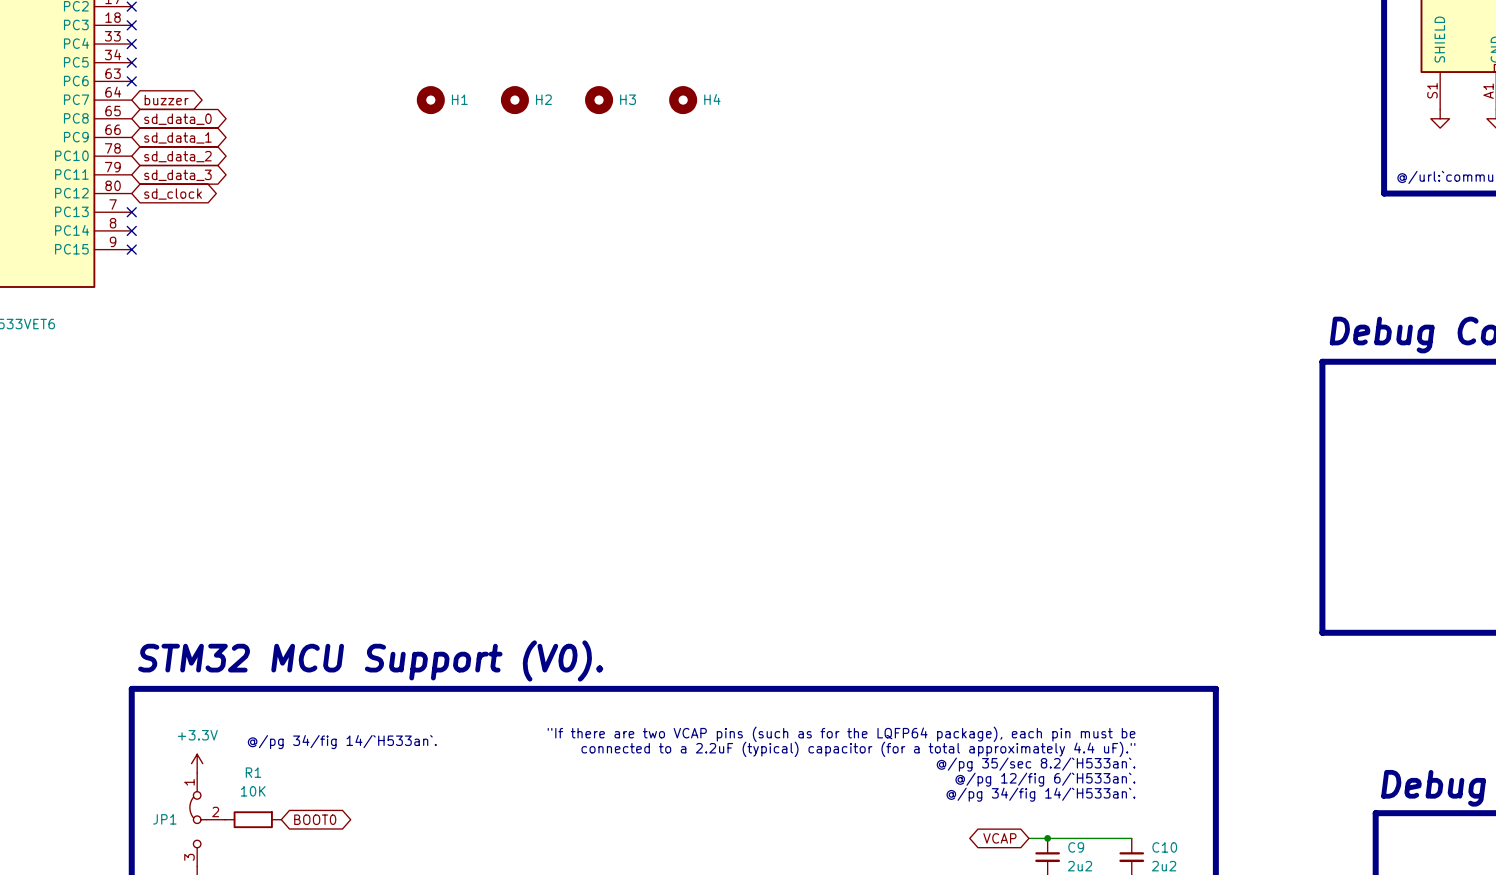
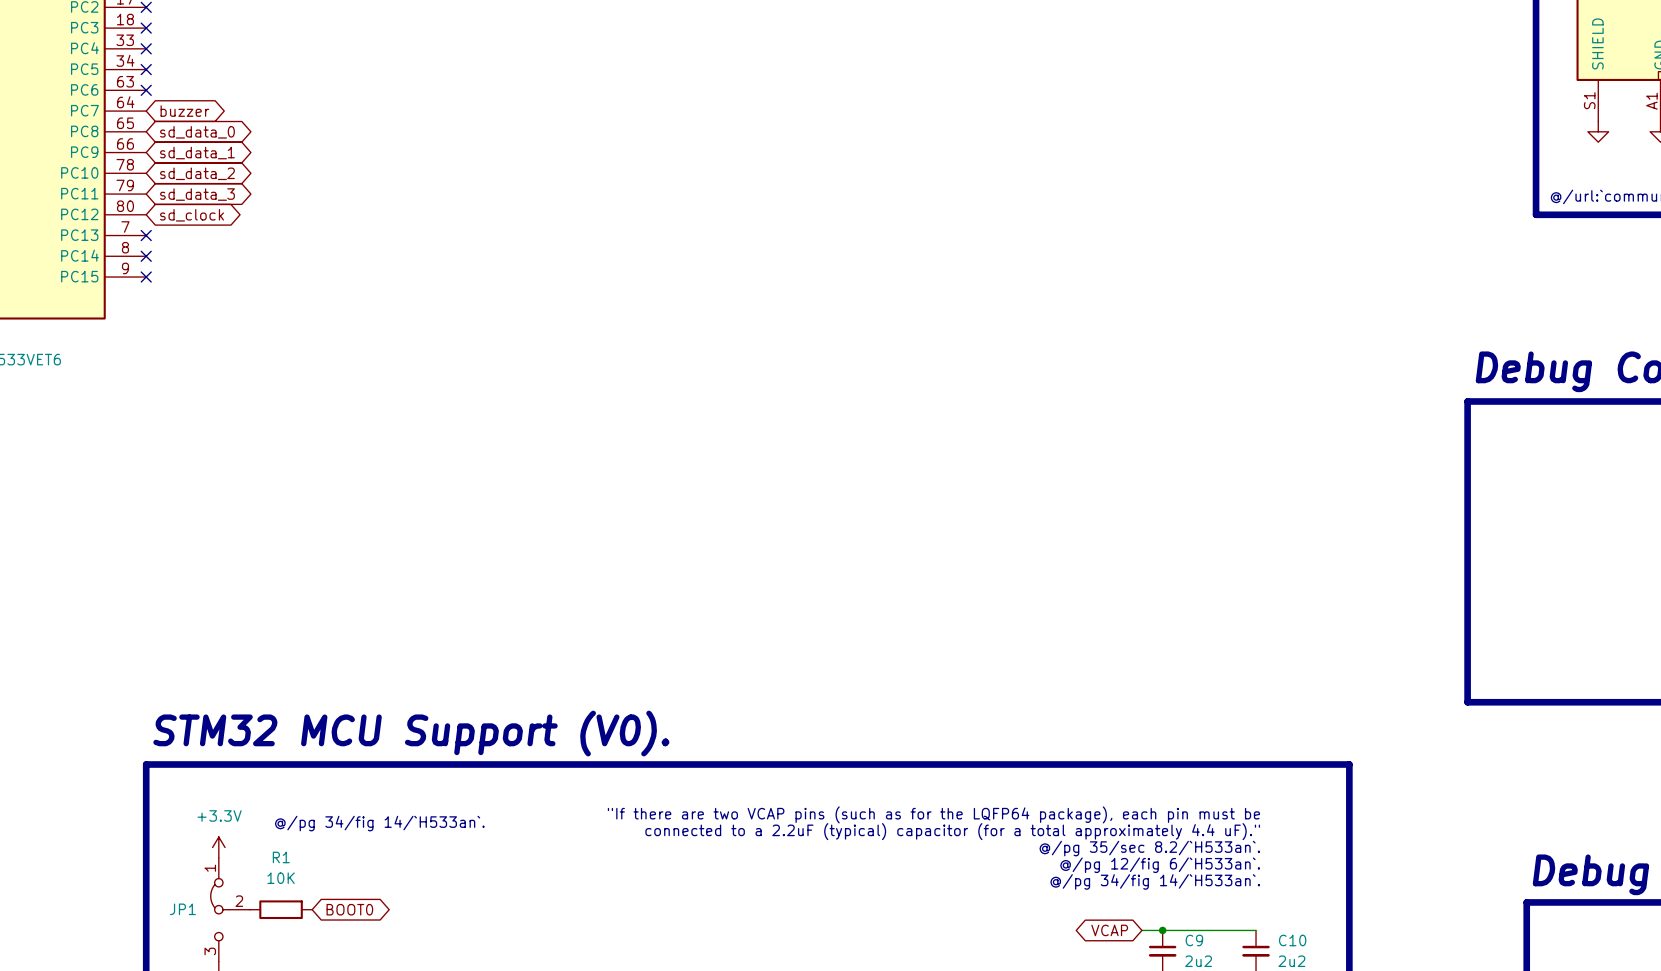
H1: (430, 100) -> none
H2: (514, 100) -> none
H3: (599, 100) -> none
H4: (683, 100) -> none

